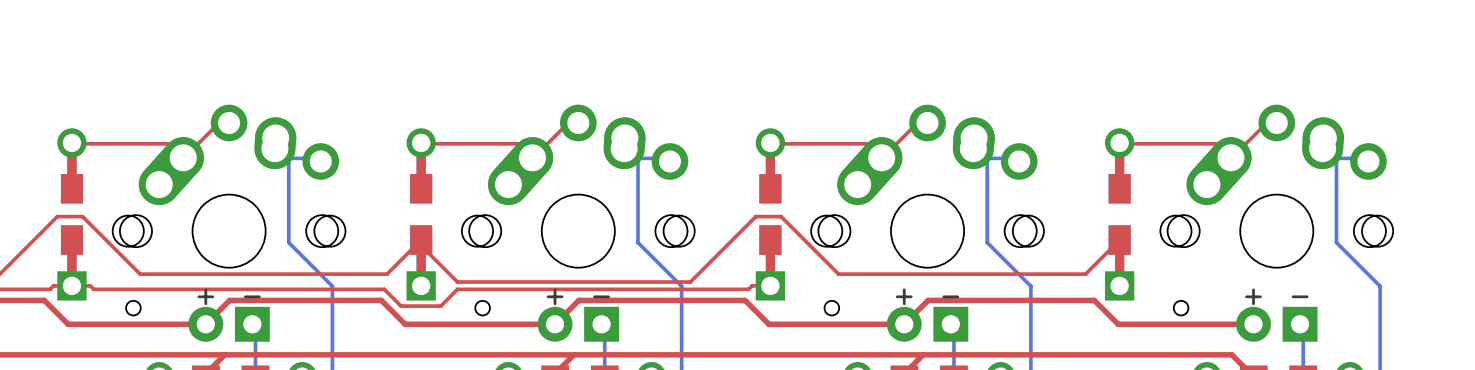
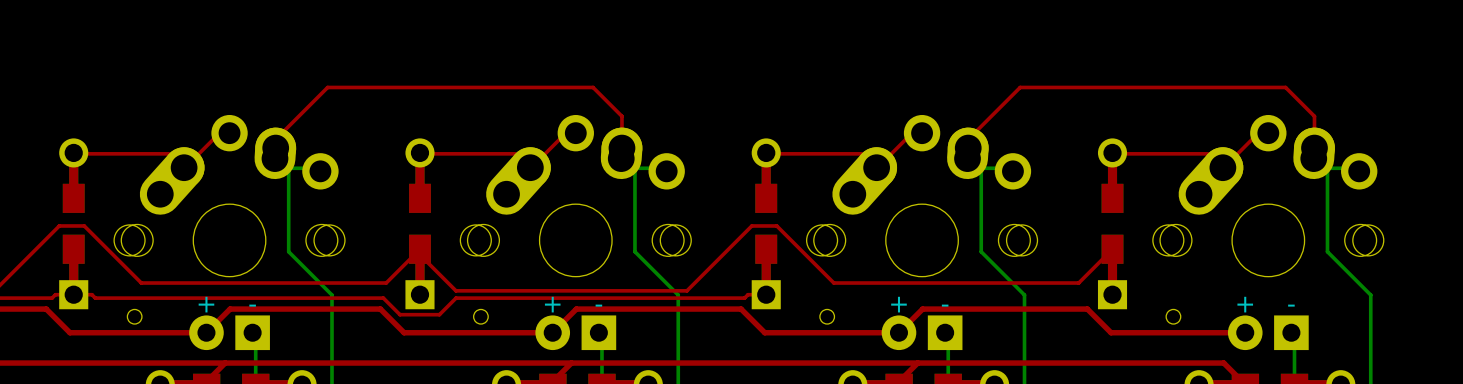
top track: none -> (275, 139) (327, 87) (593, 87) (621, 116) (621, 139)
top track: none -> (968, 139) (1020, 87) (1285, 87) (1314, 116) (1314, 139)

